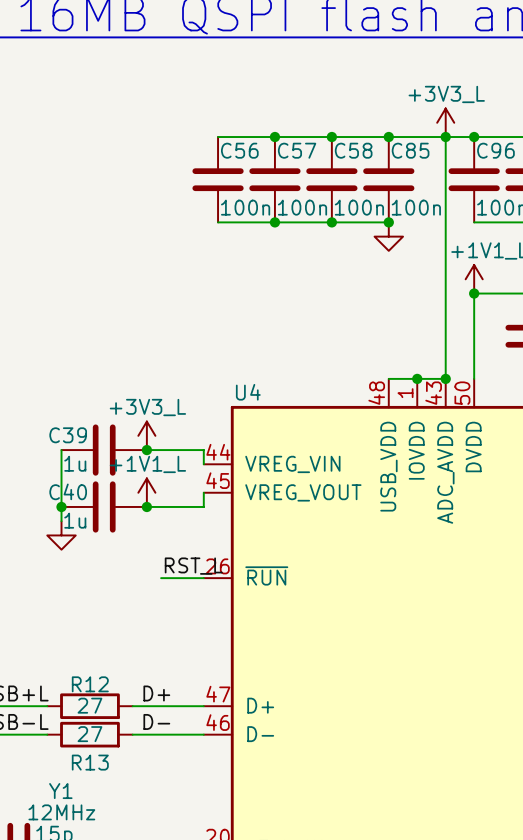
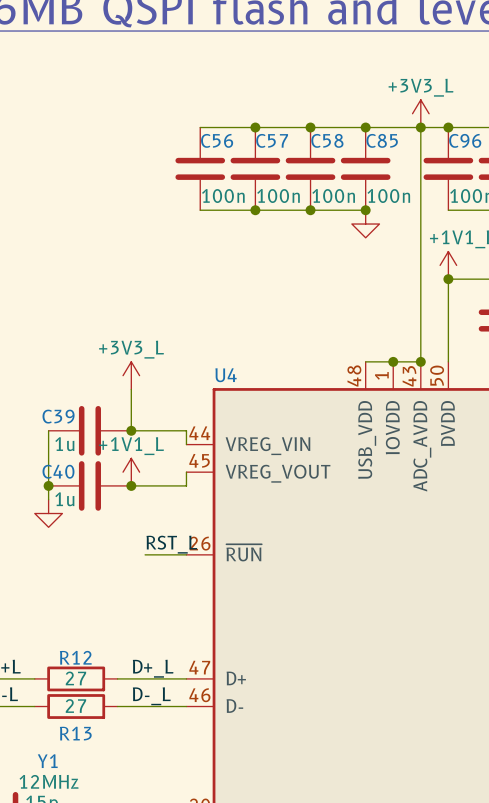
power symbol position: +3V3_L (146, 435) -> +3V3_L (131, 375)
label: D+ (156, 693) -> D+_L (153, 668)
label: D- (156, 721) -> D-_L (151, 696)

